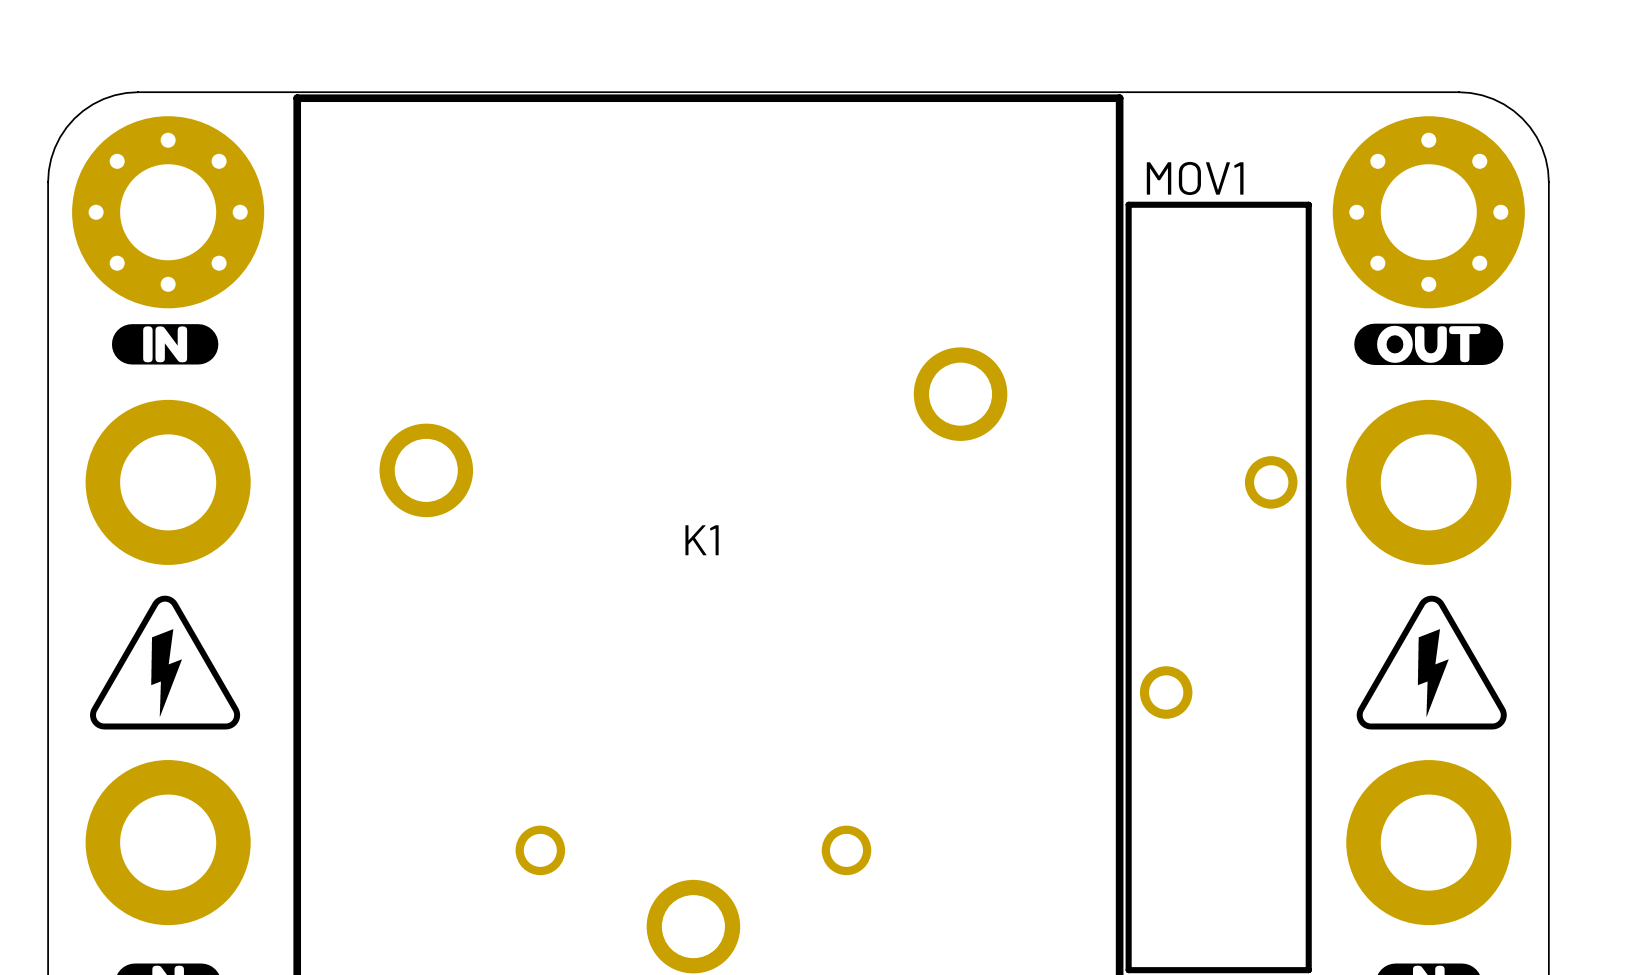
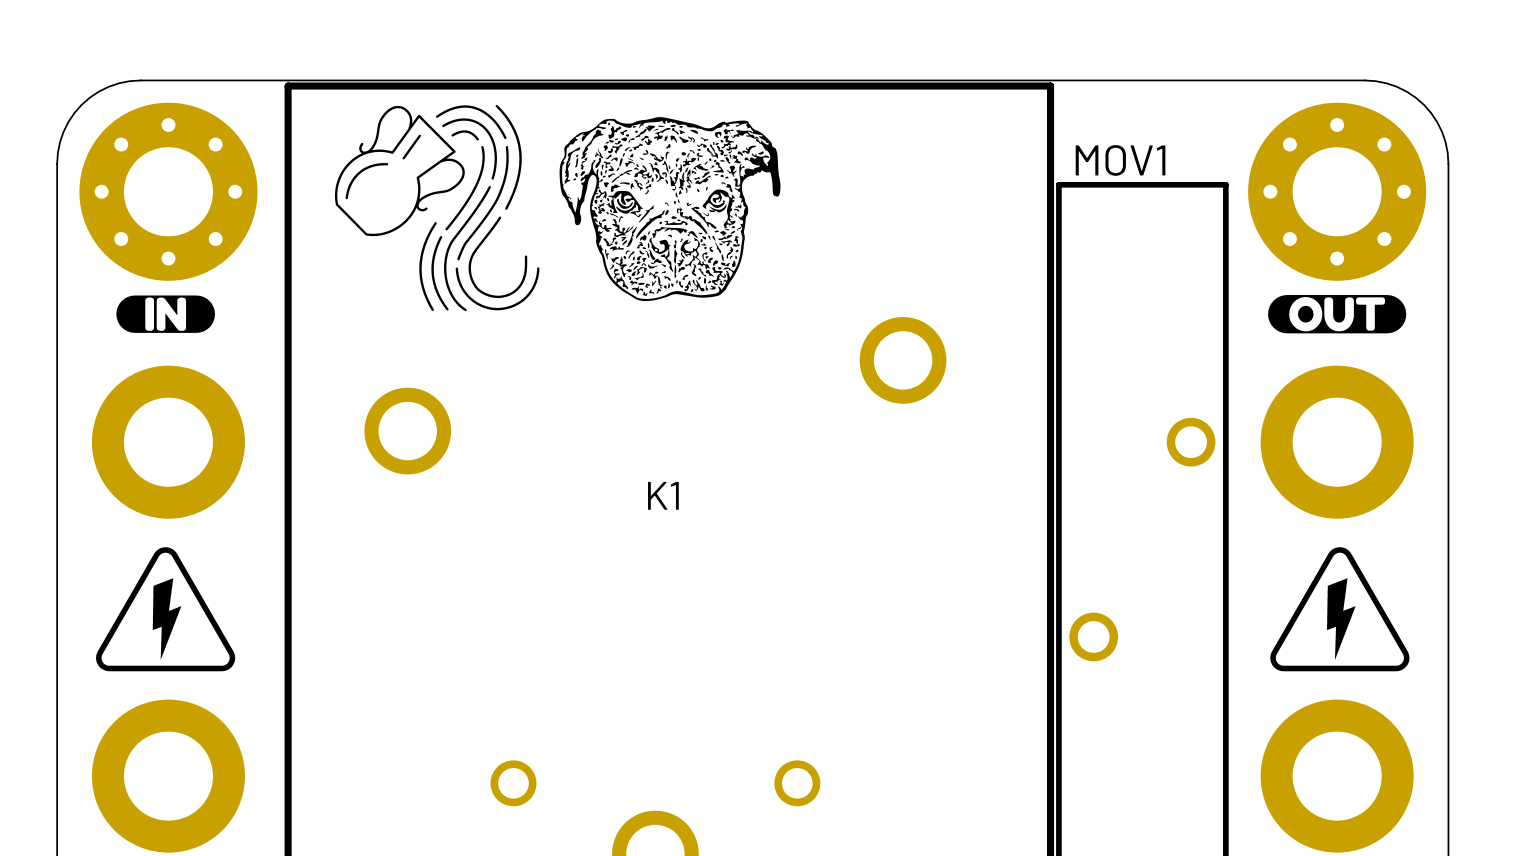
drawing: none -> [334, 104, 781, 312]

